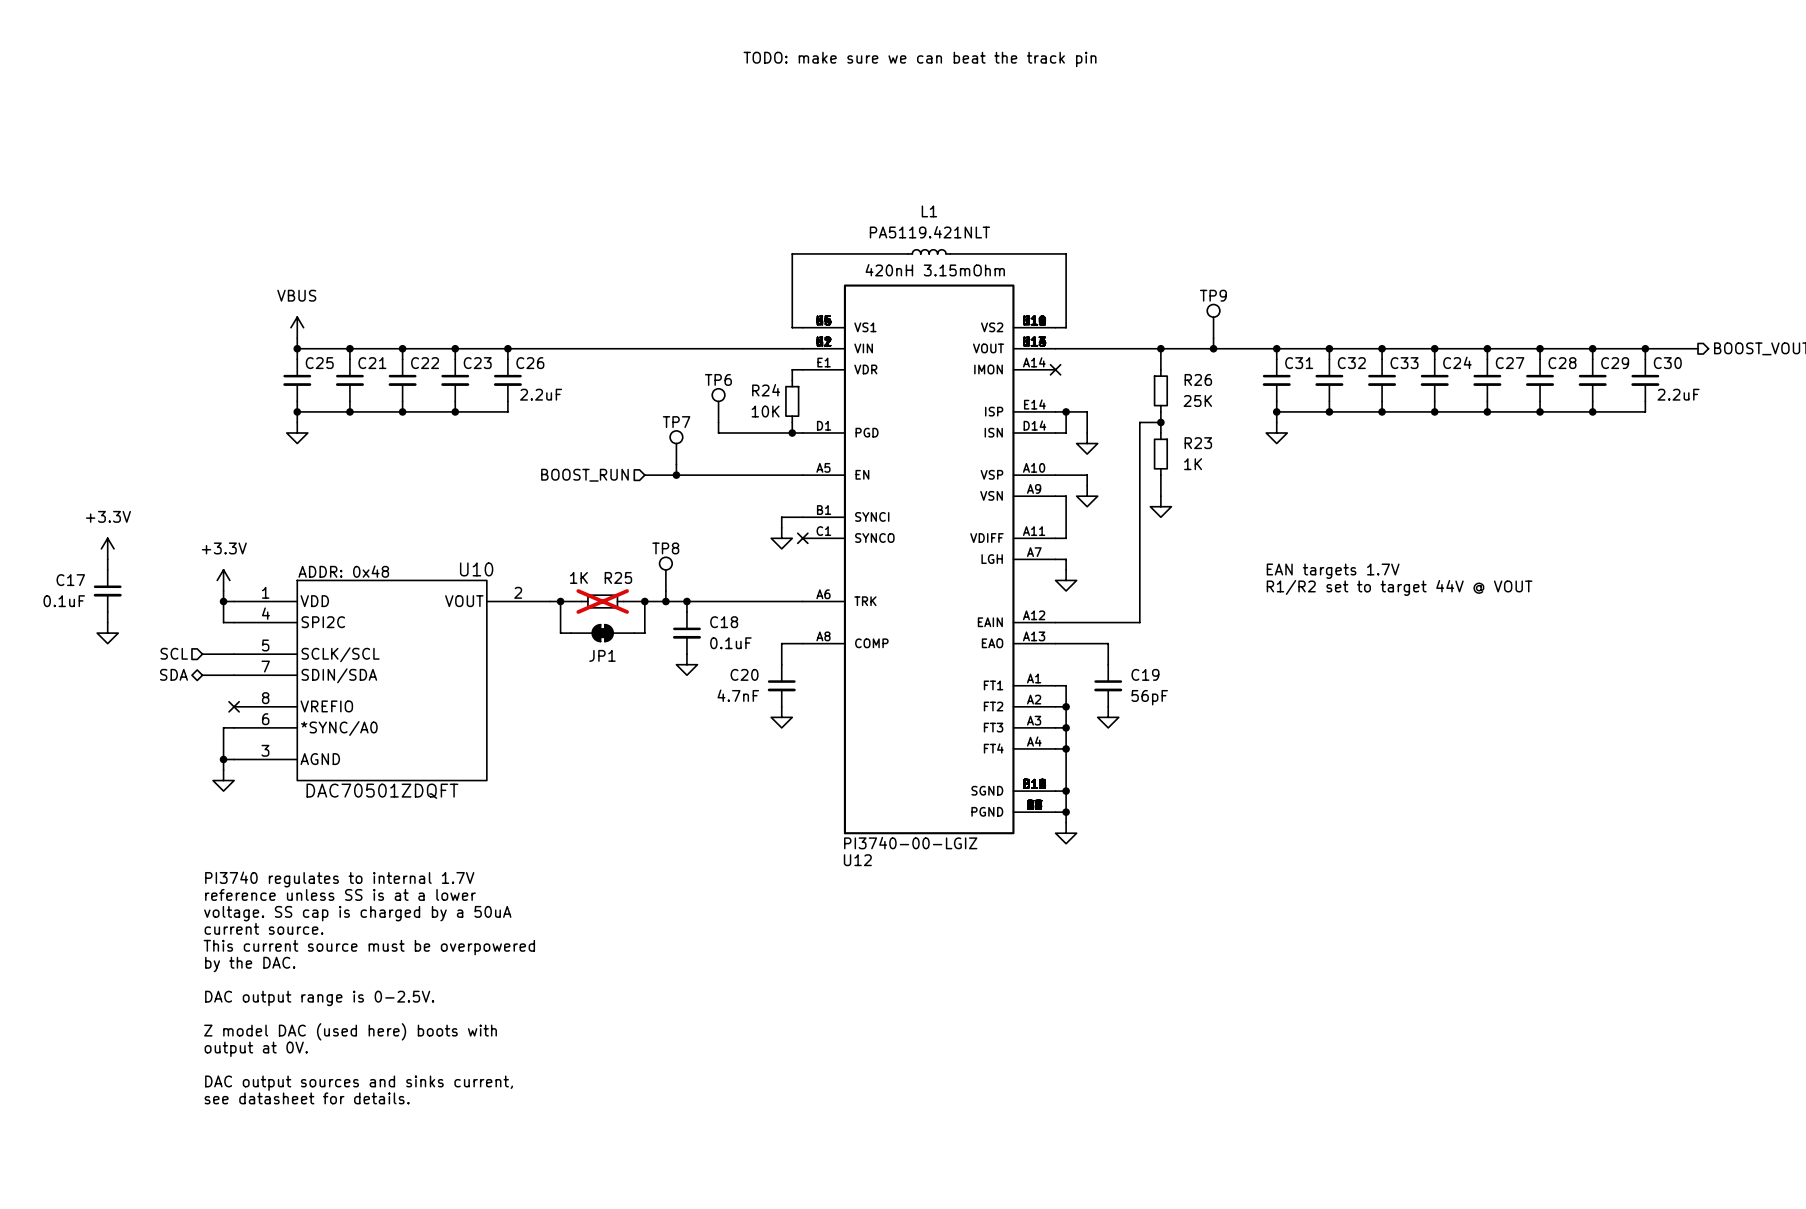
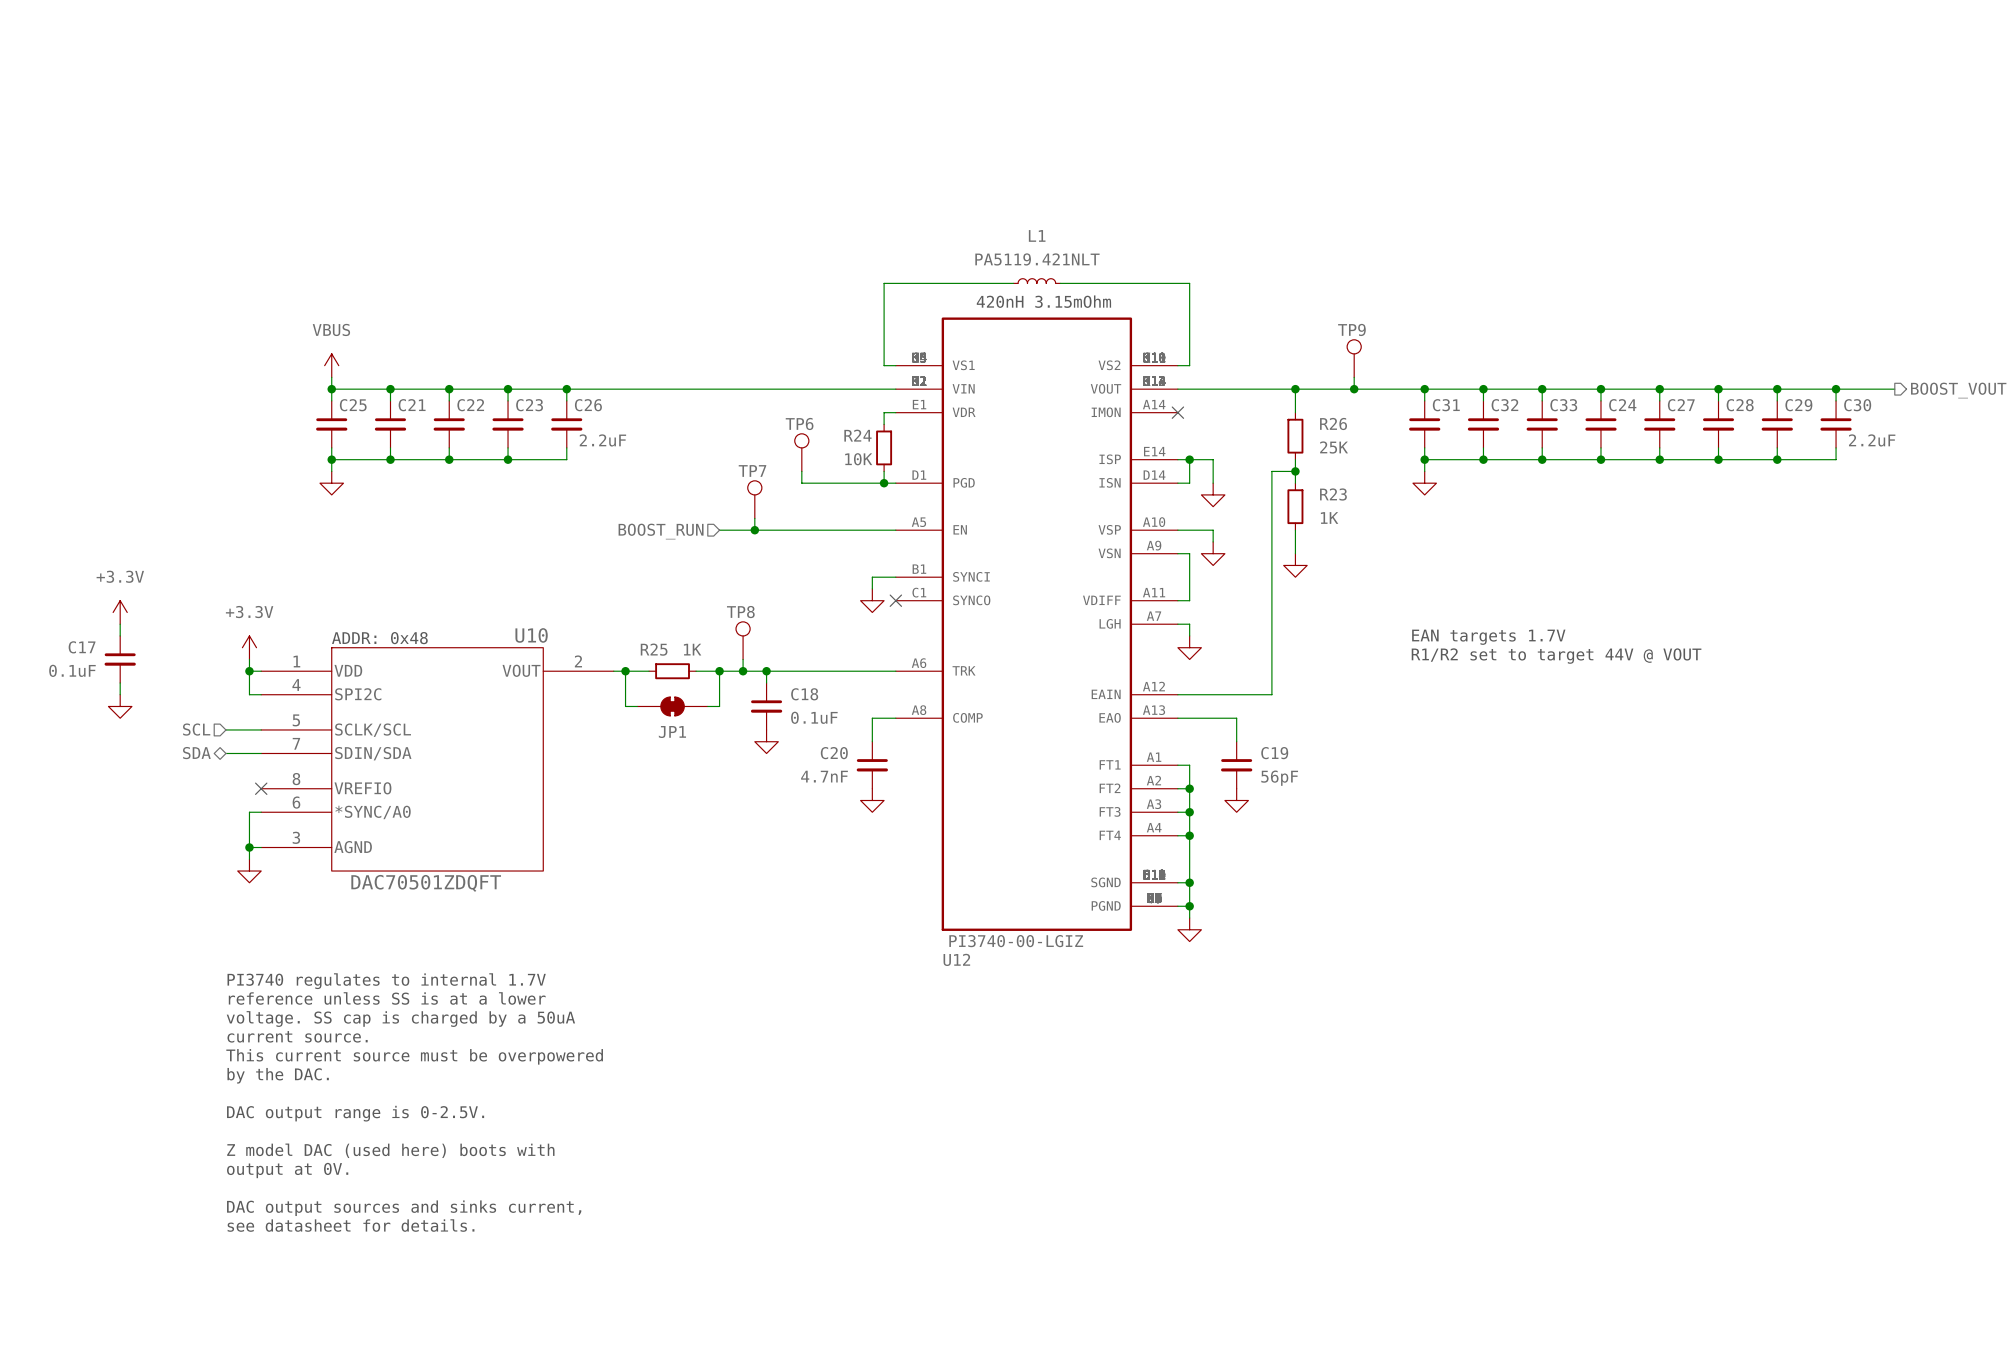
text: TODO: make sure we can beat the track pin (920, 59) -> none
R25 value position: 1K (578, 577) -> 1K (692, 649)
R25 name position: R25 (618, 577) -> R25 (654, 649)
R25 do-not-place cross: (602, 601) -> none

